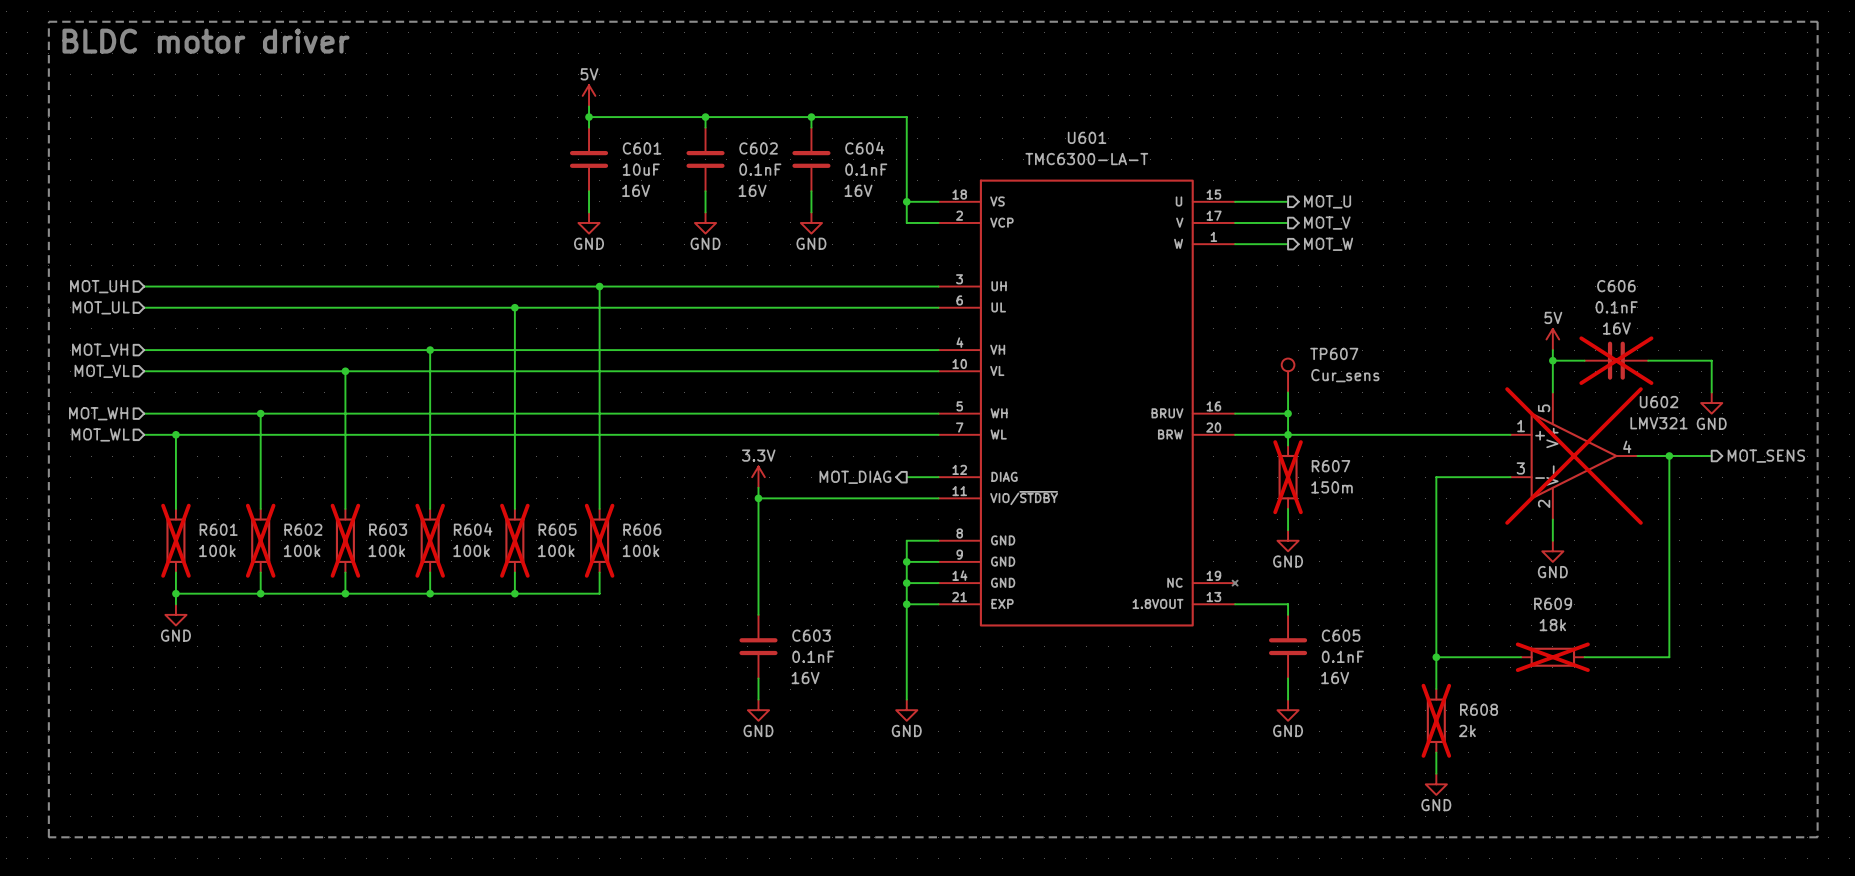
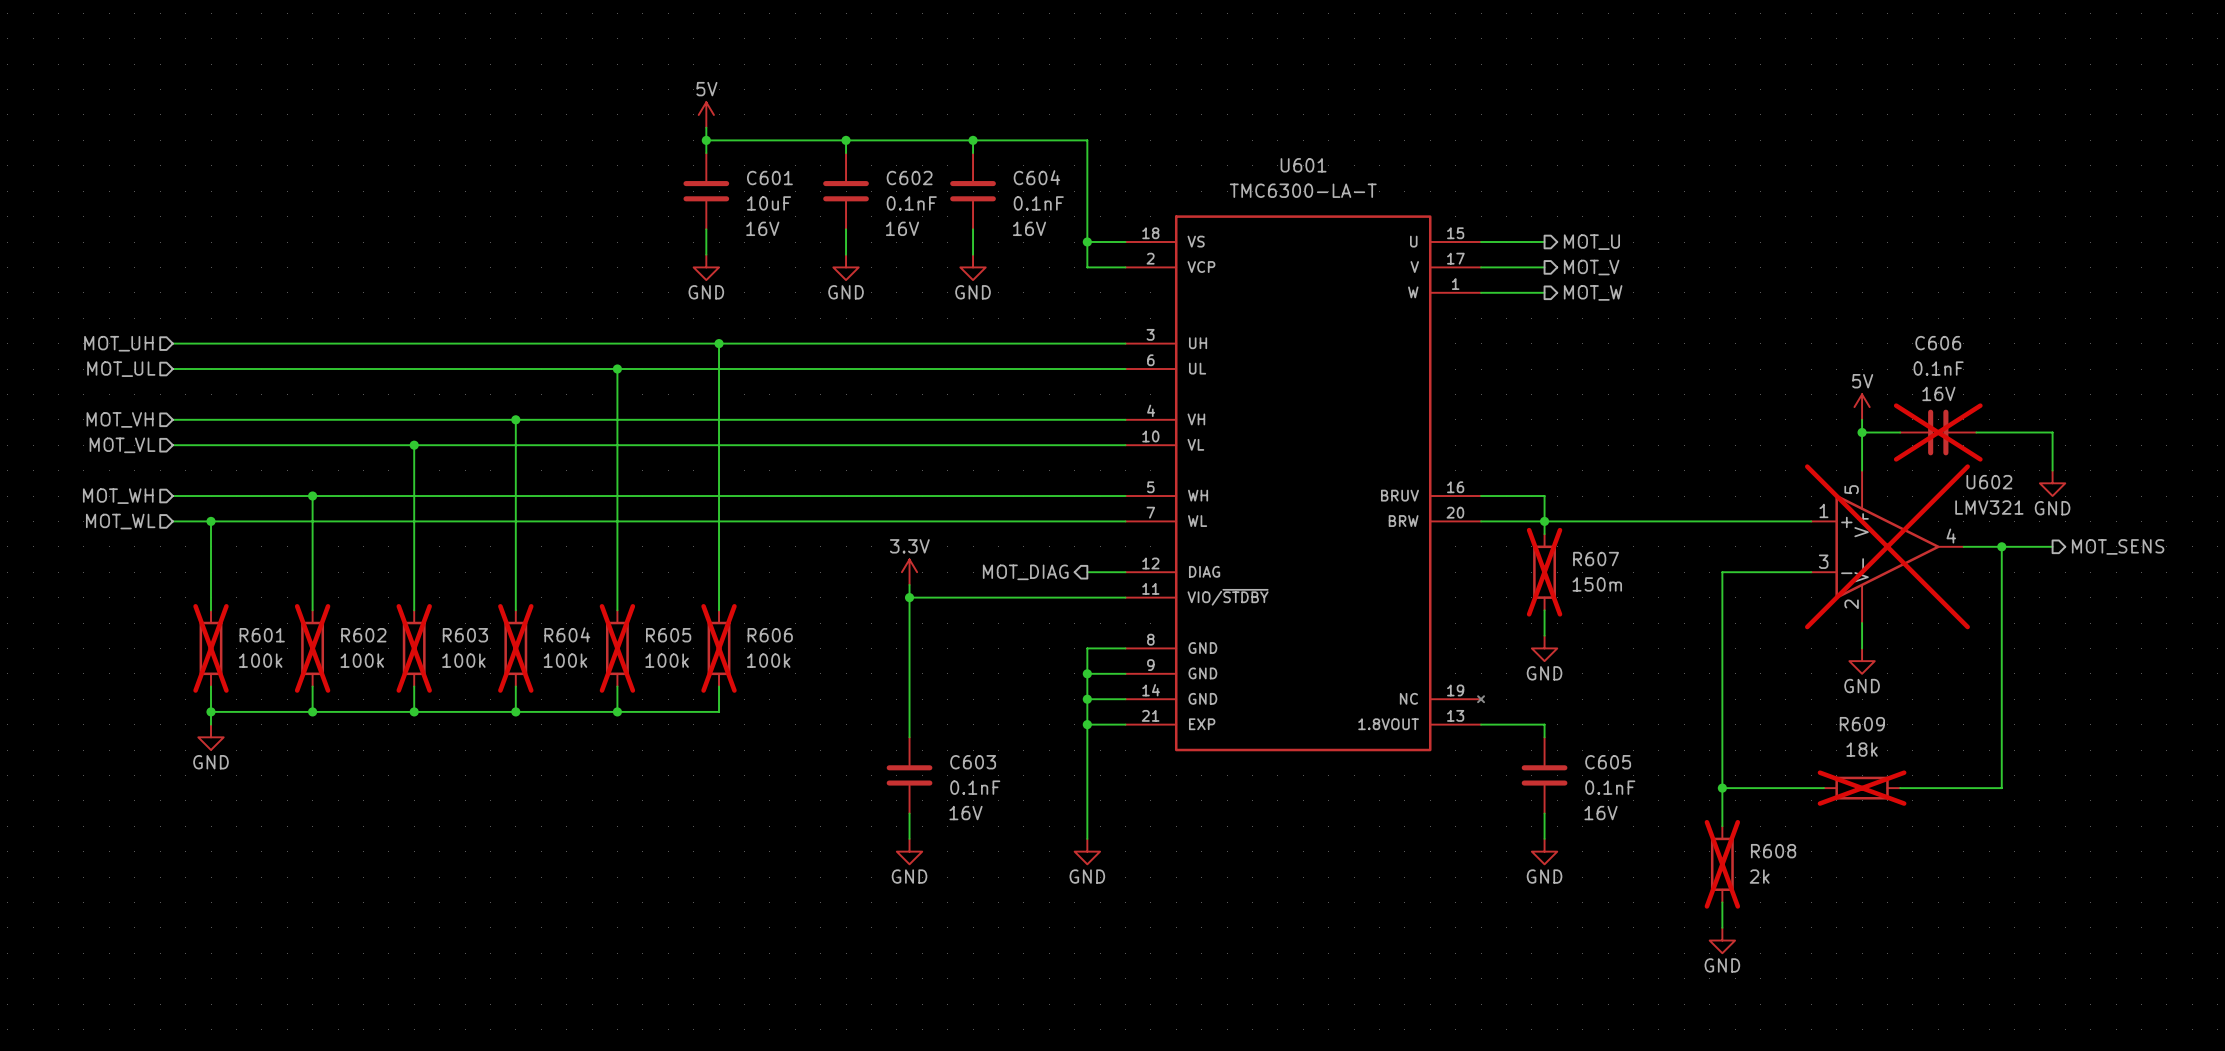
line: (48, 21) (1817, 21) (1817, 837) (48, 837) (48, 21) -> none
text: BLDC motor driver (205, 41) -> none
TP607: Cur_sens (1288, 375) -> none
wire: (1288, 392) (1288, 413) -> none
junction: (1288, 413) -> none

